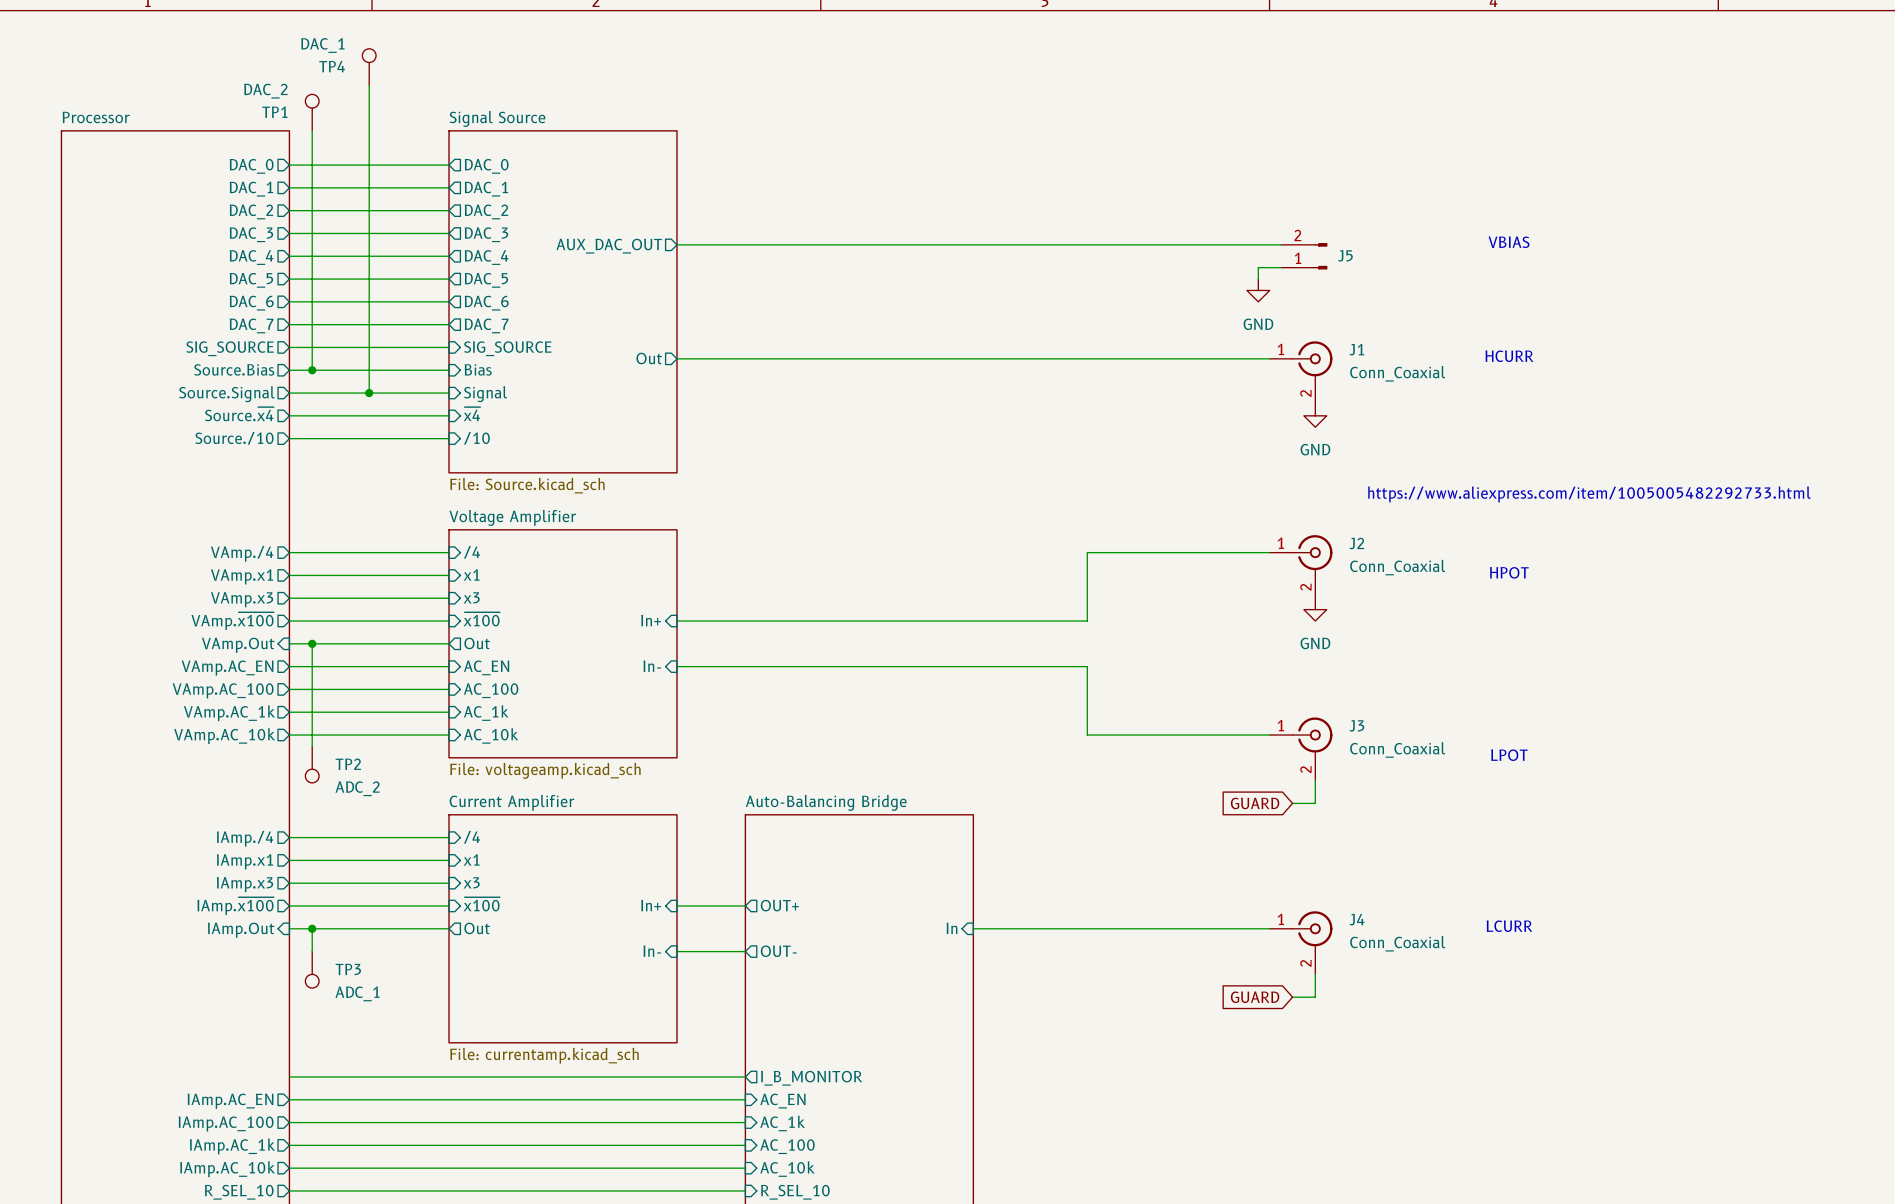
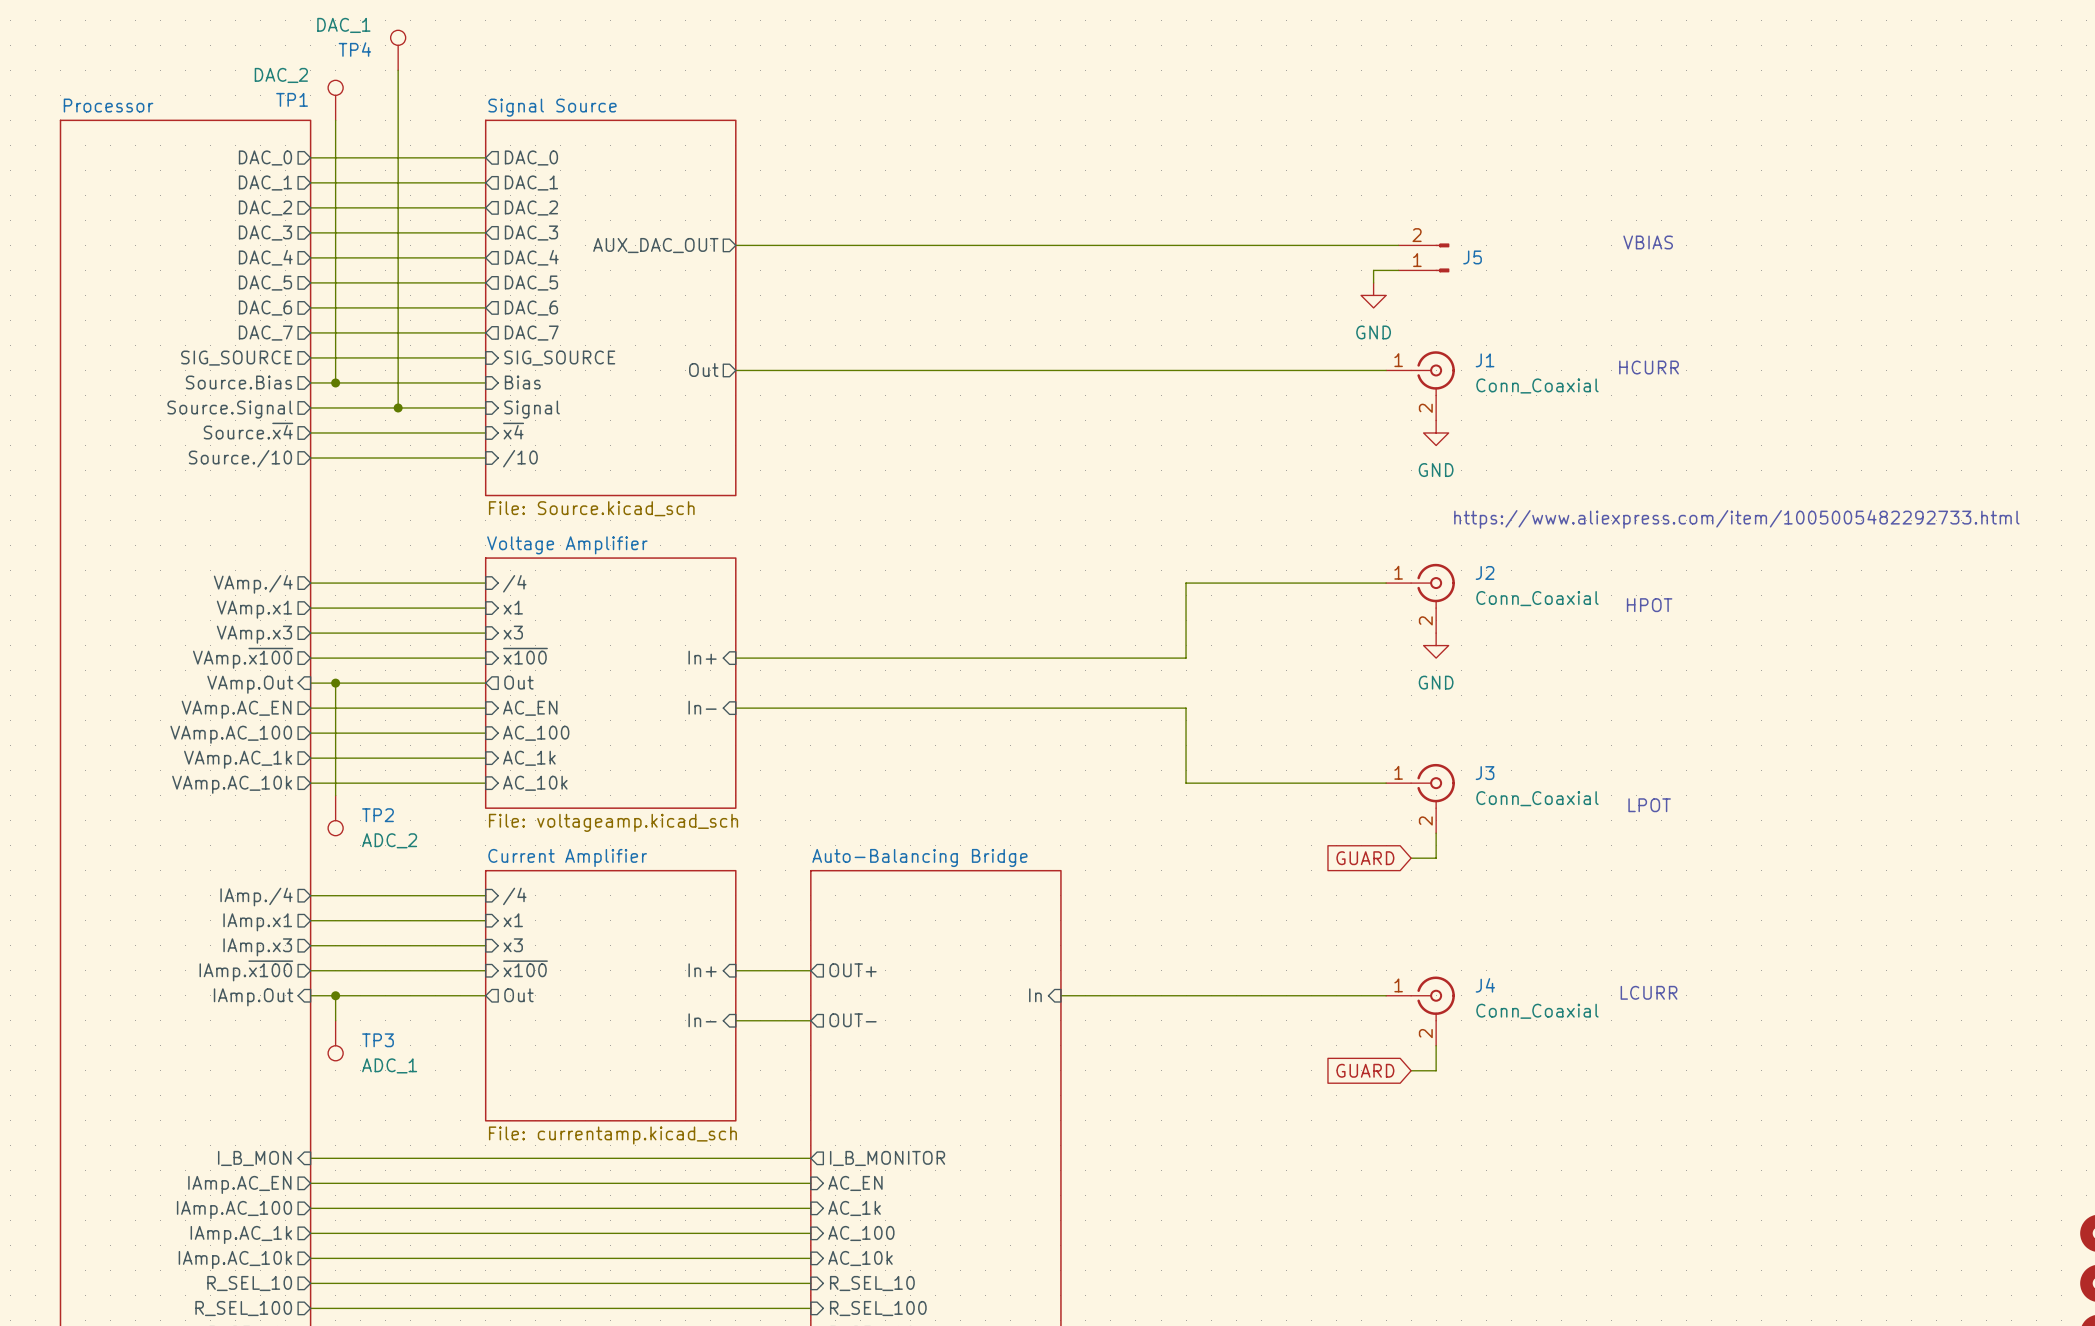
sheet pin: none -> I_B_MON (254, 1158)

